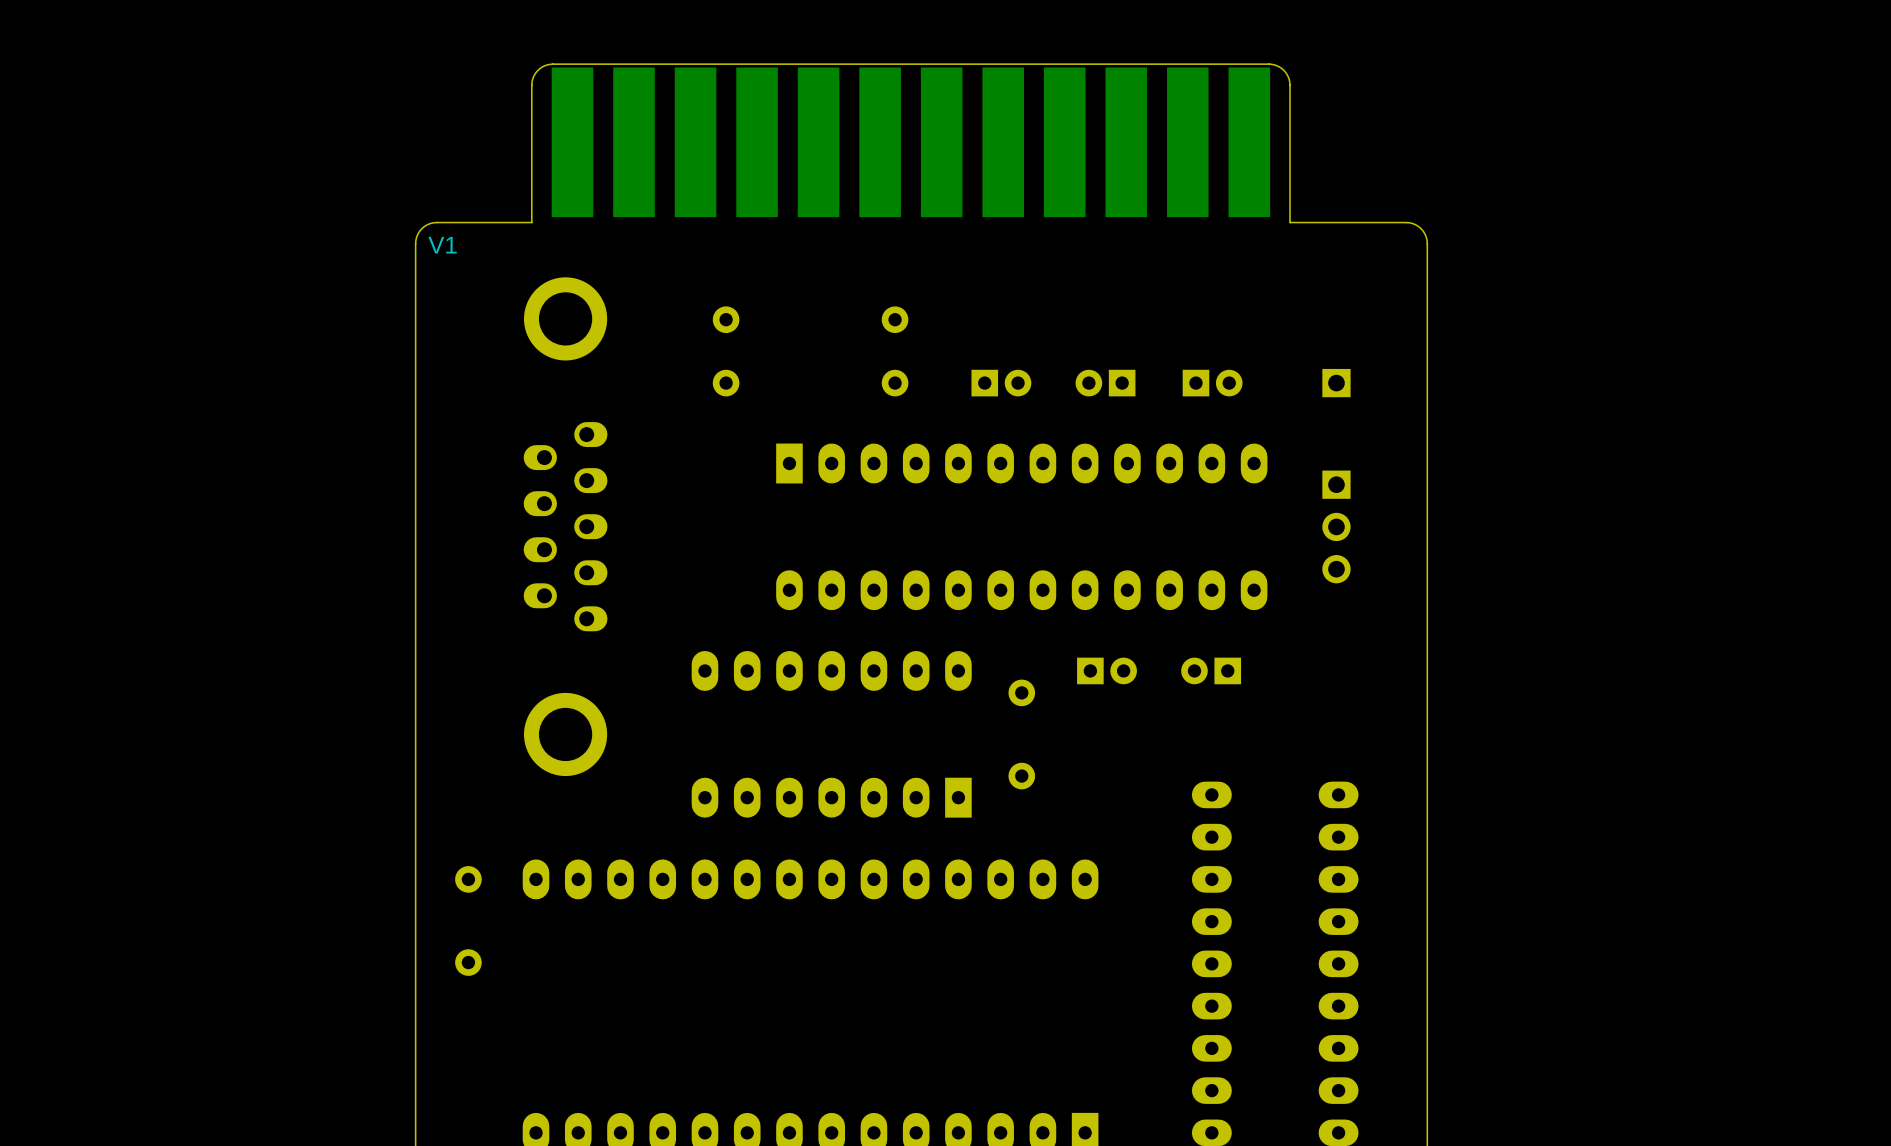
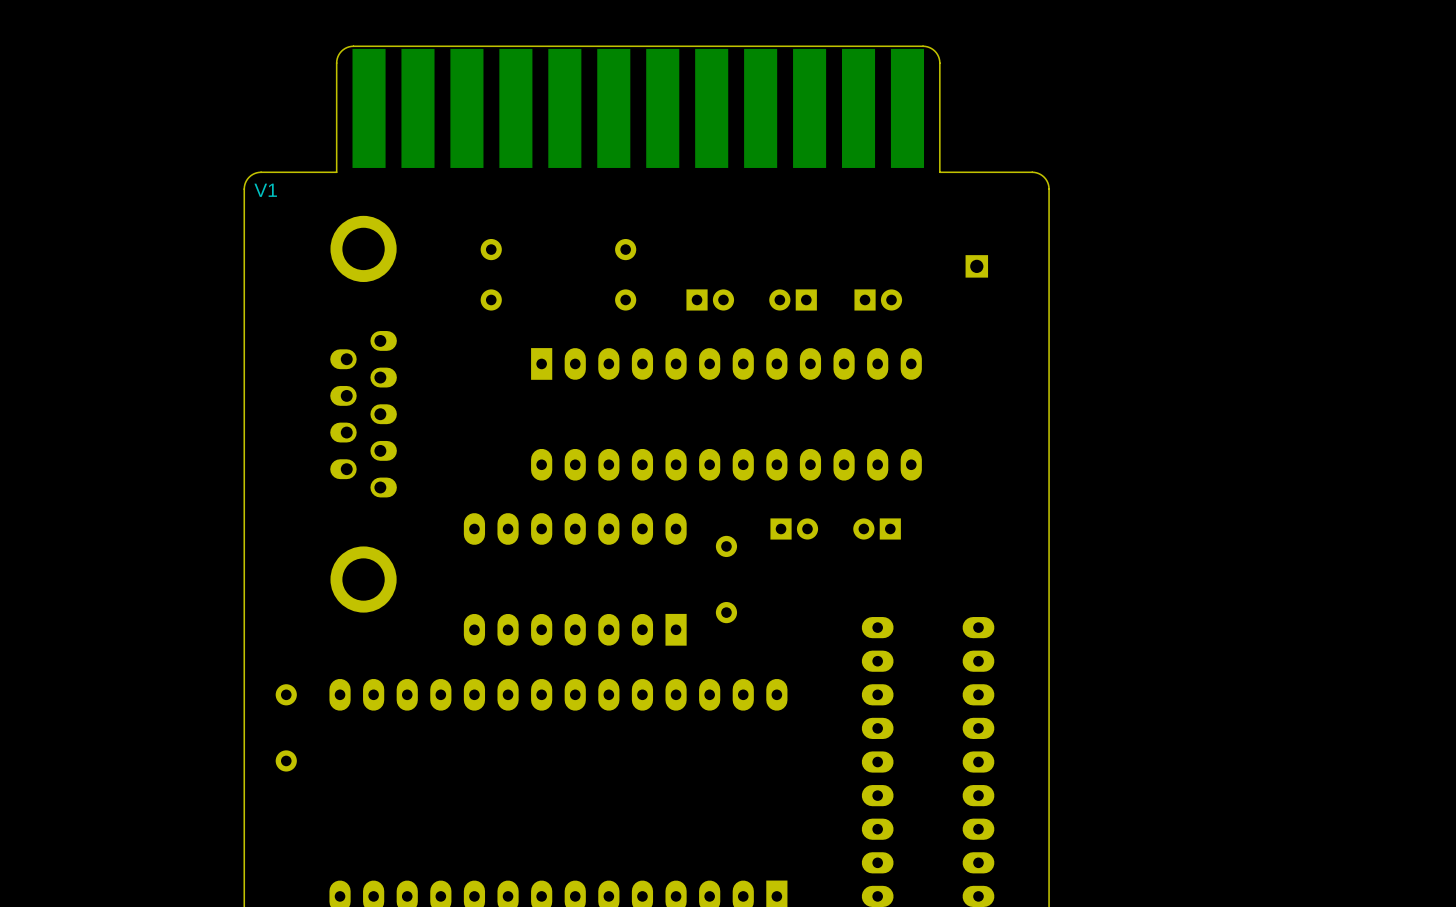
part position: (1336, 383) -> (976, 266)
part: (1336, 526) -> none

